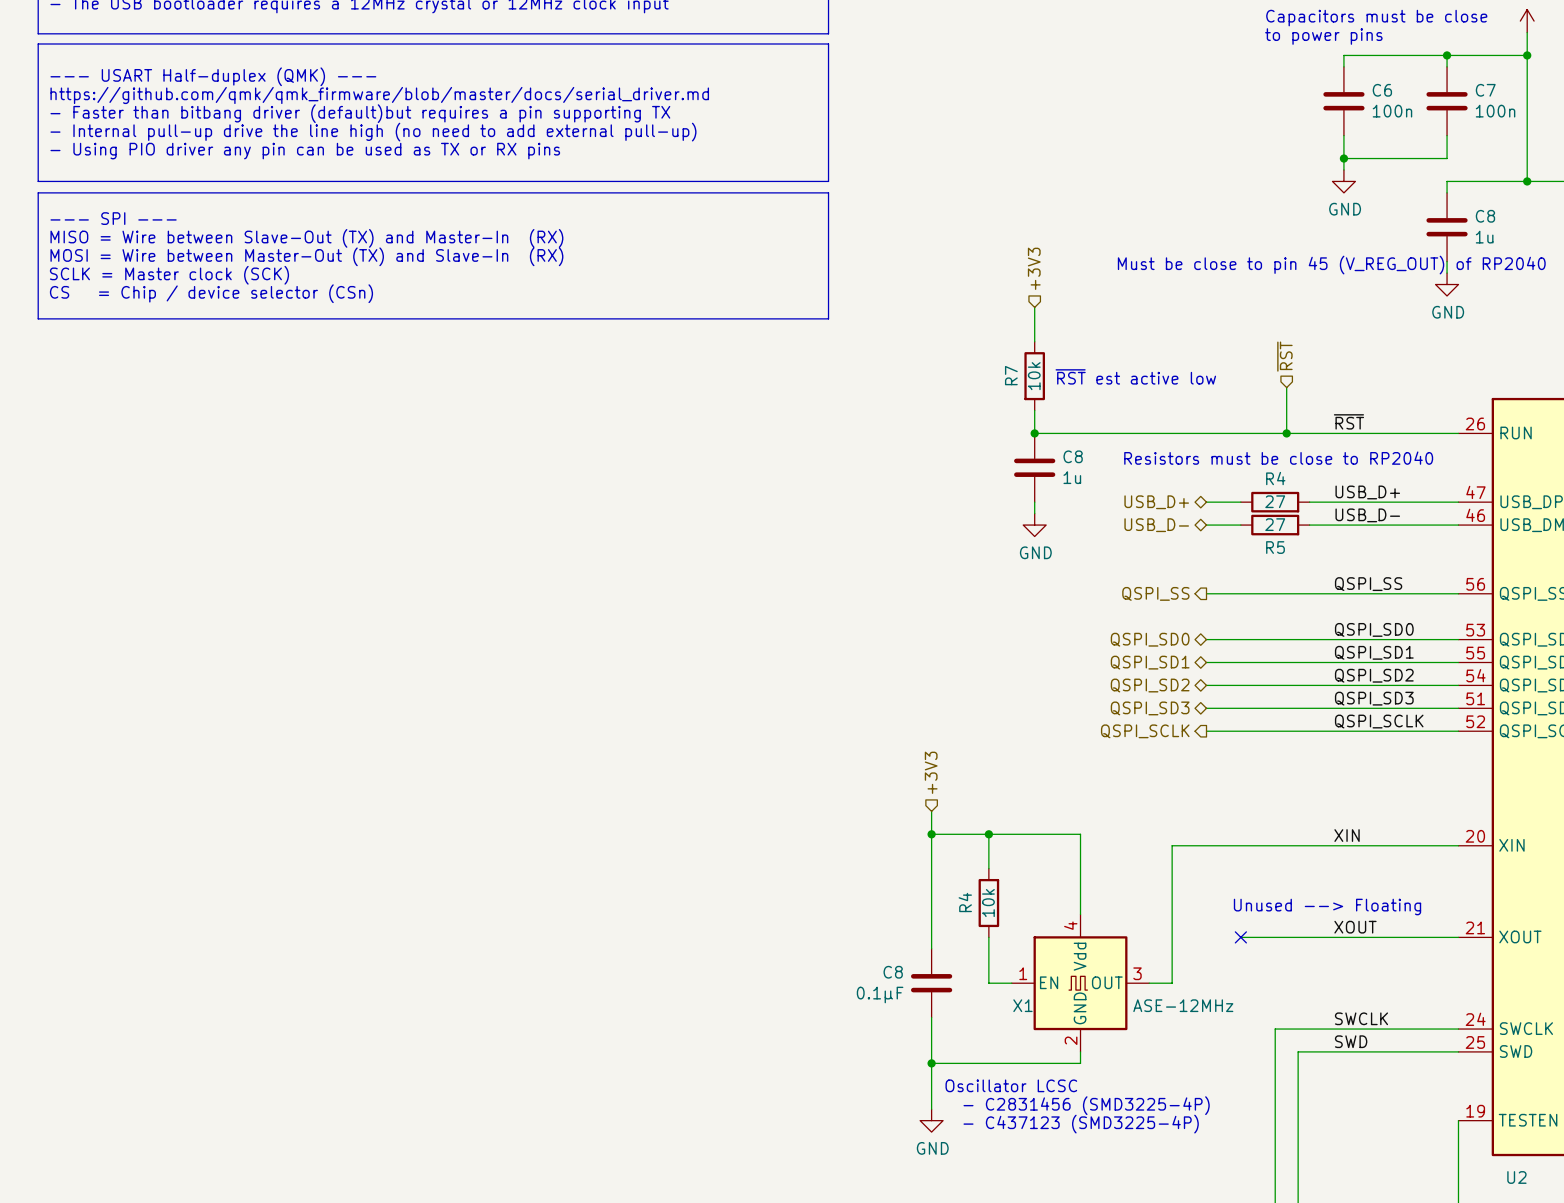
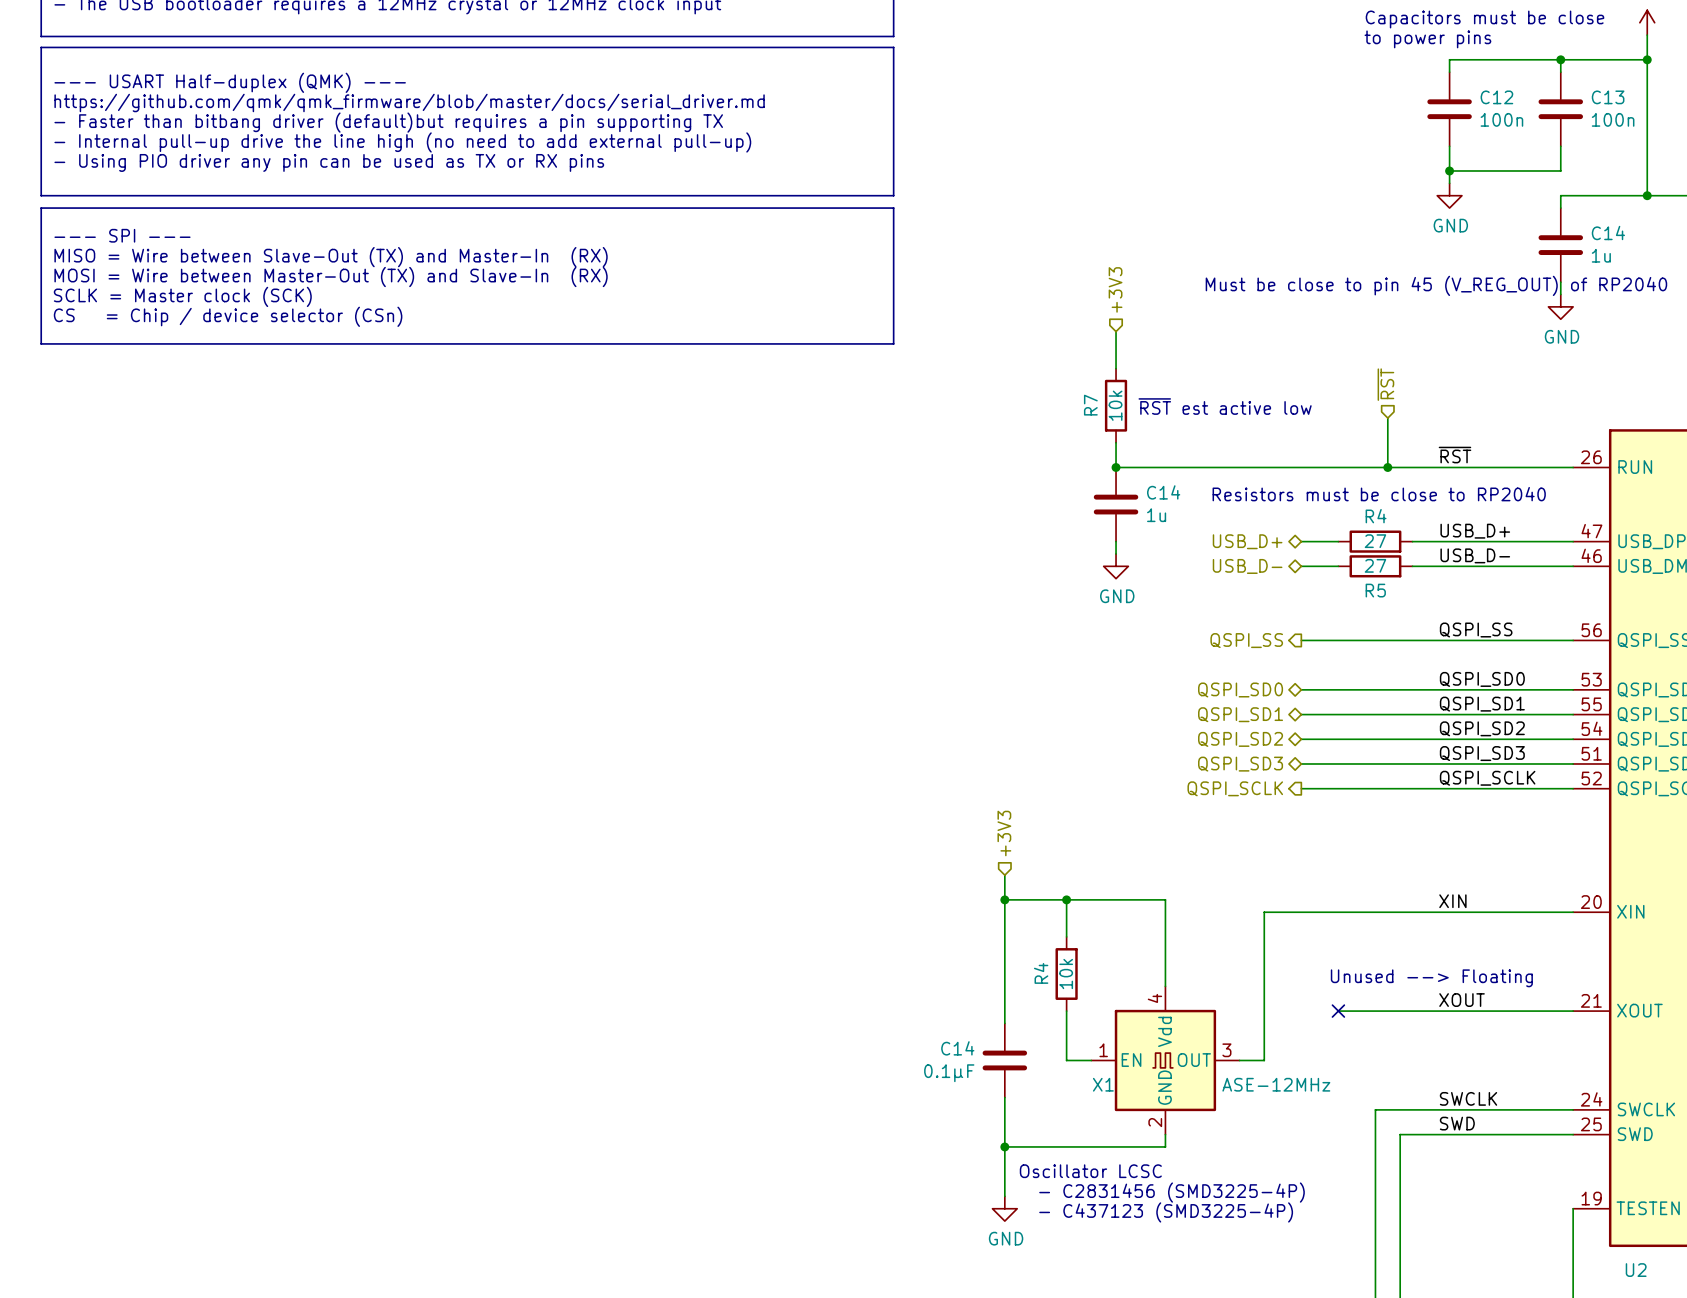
C6 name: C6 (1382, 90) -> C12 (1496, 97)
C7 name: C7 (1485, 90) -> C13 (1608, 97)
C8 name: C8 (1485, 216) -> C14 (1608, 232)
C8 name: C8 (1073, 456) -> C14 (1163, 492)
C8 name: C8 (893, 972) -> C14 (957, 1048)

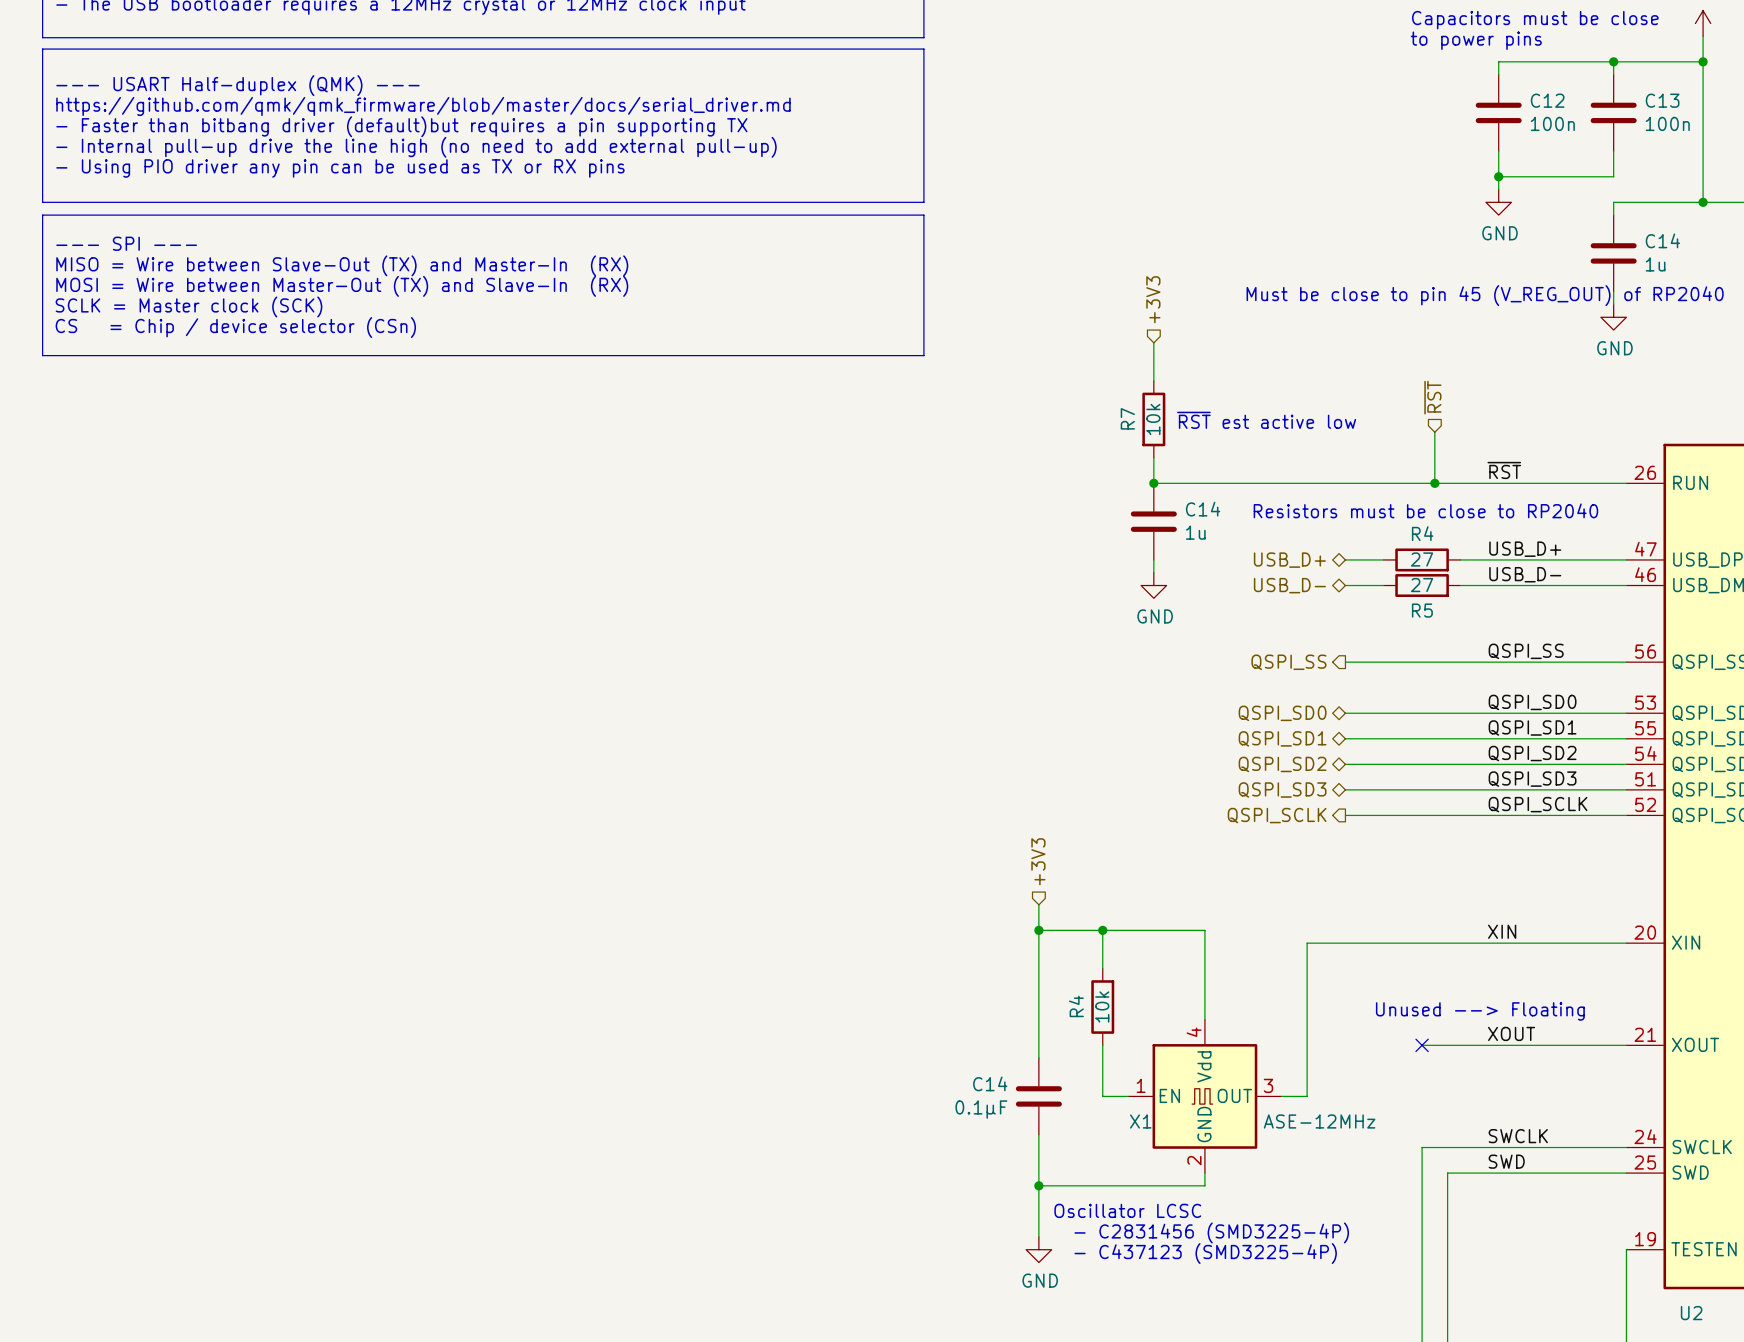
wire: (1338, 1011) (1375, 1011) -> none
no-connect mark position: (1338, 1011) -> (1422, 1045)

